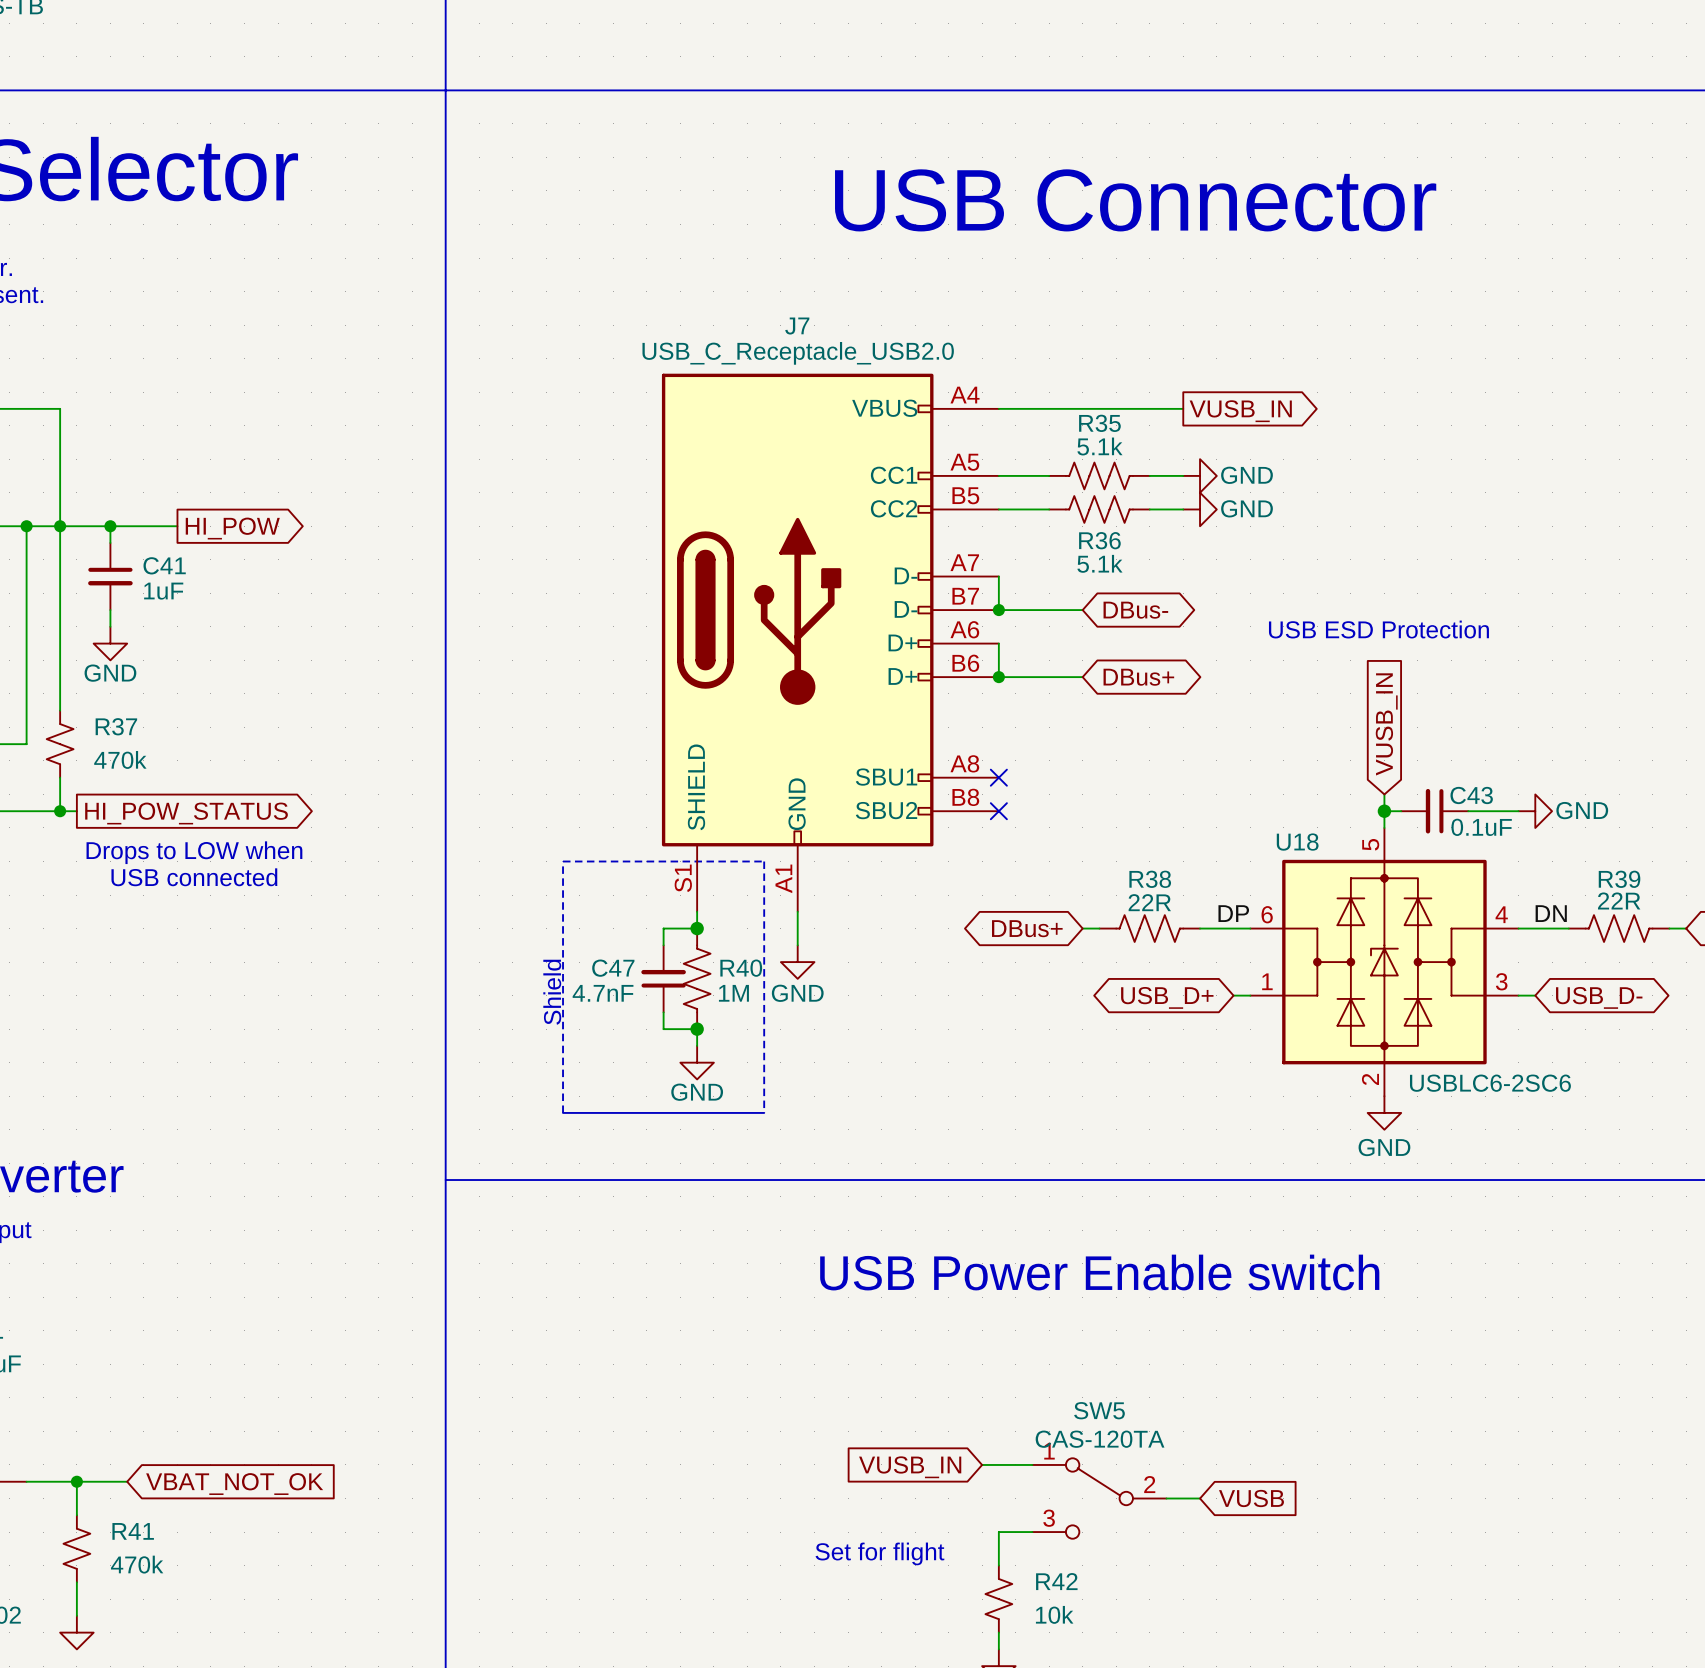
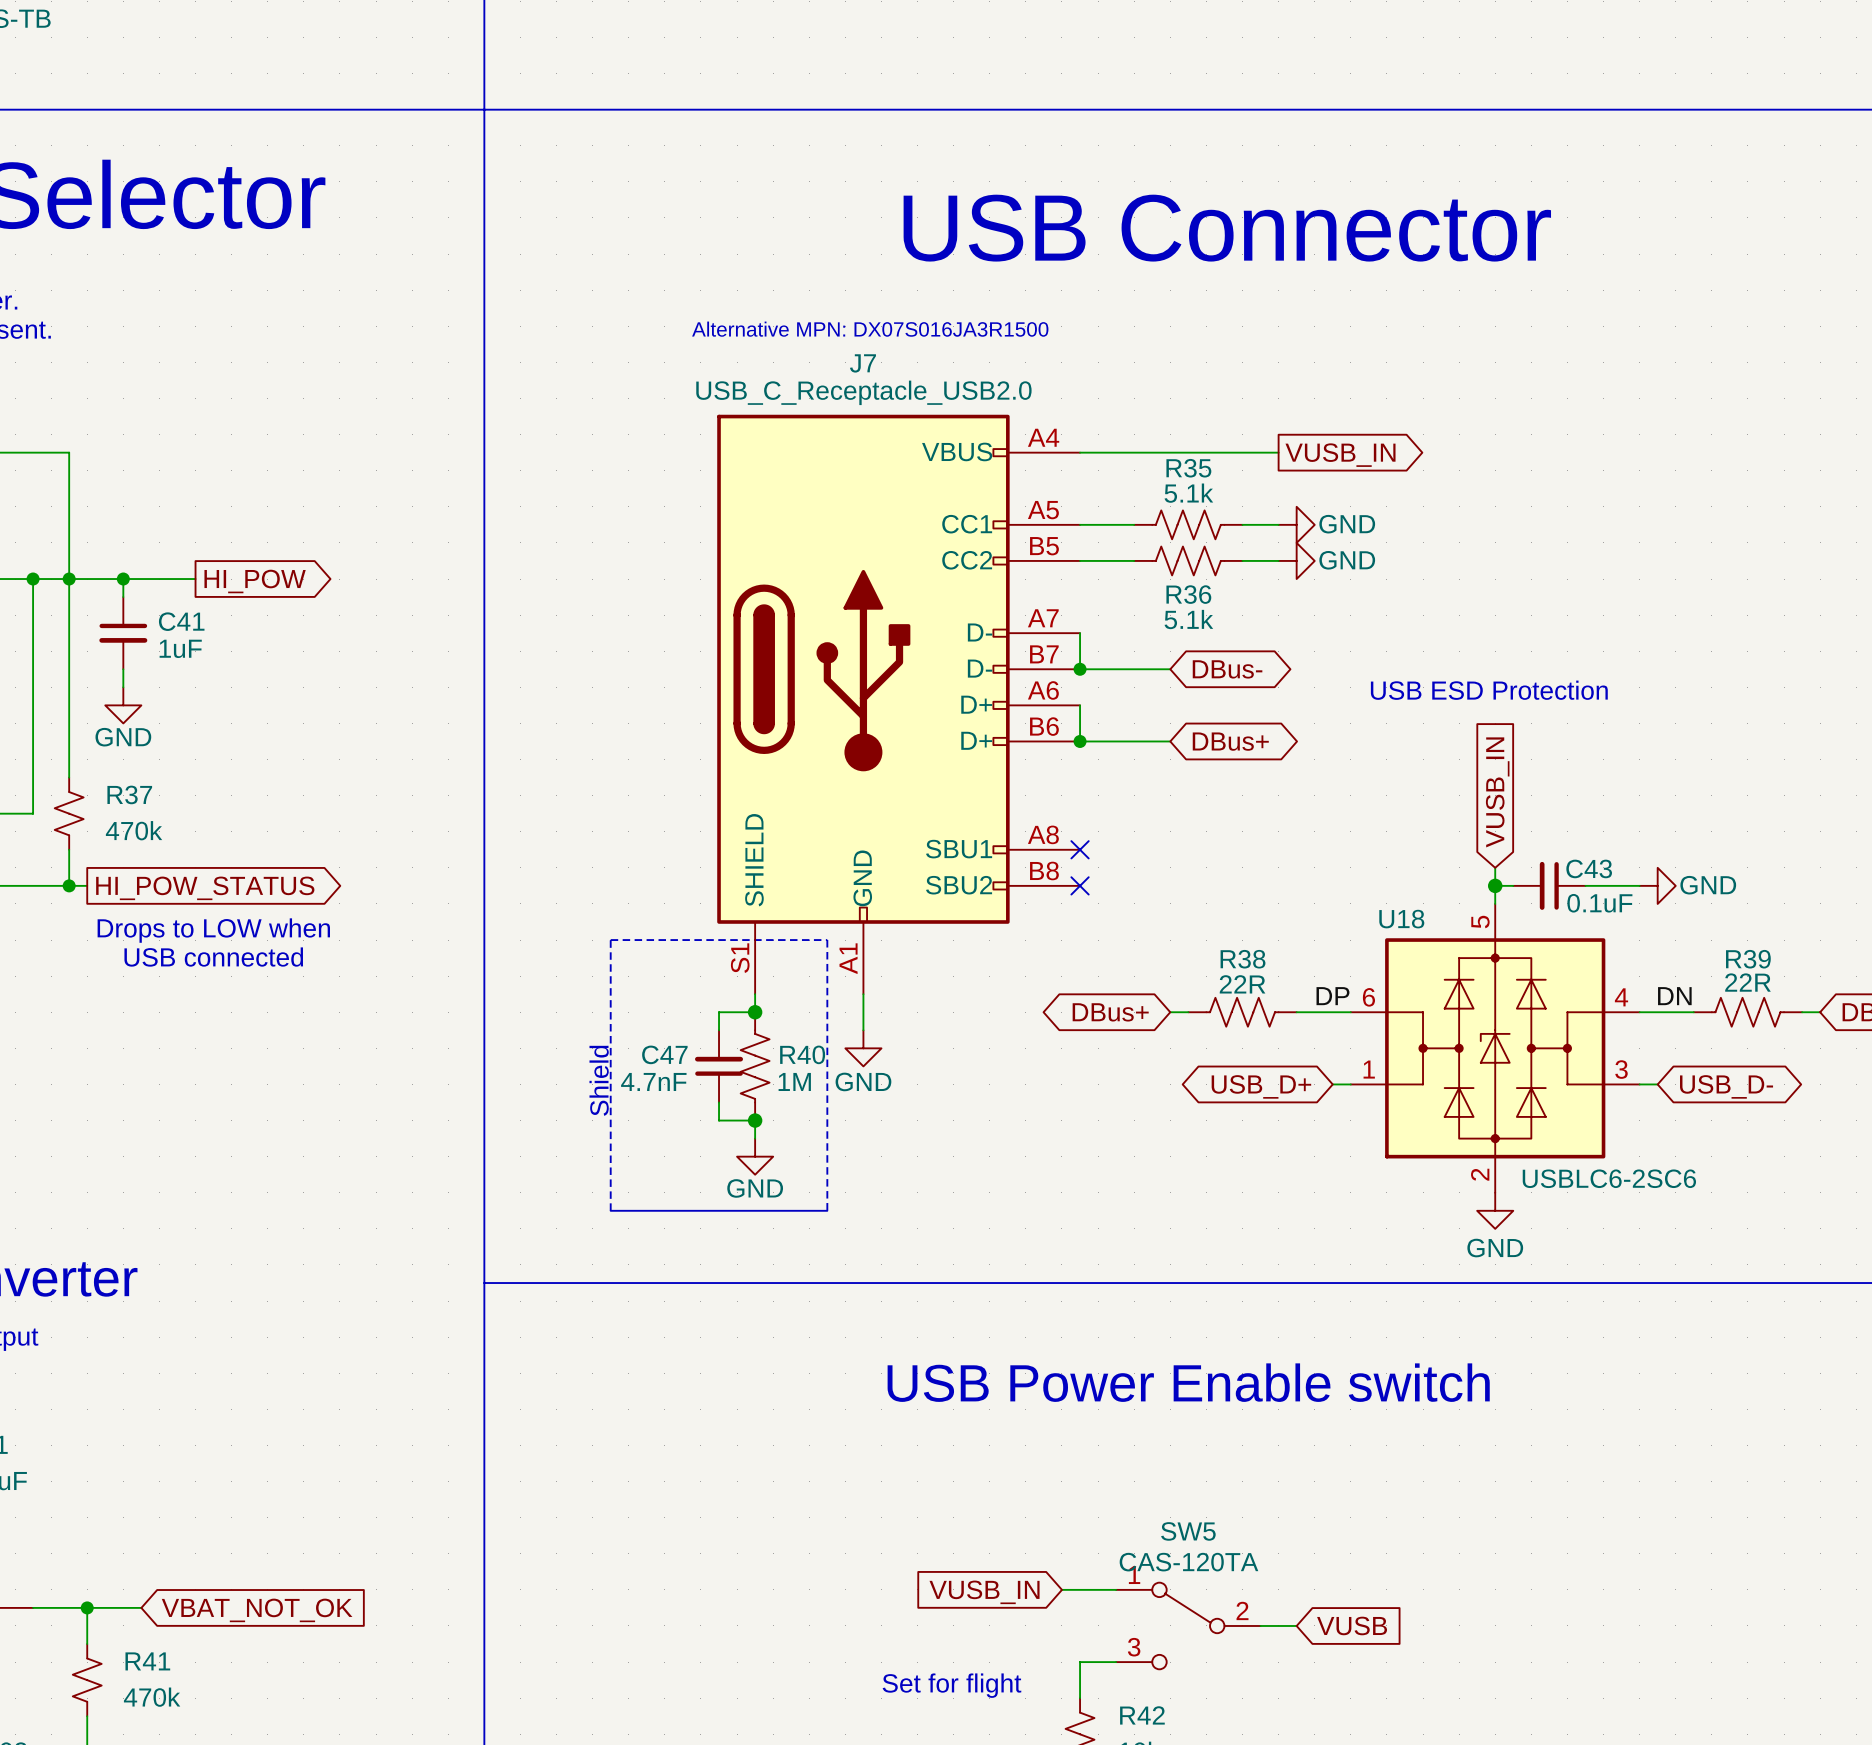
text: none -> Alternative MPN: DX07S016JA3R1500 (870, 329)

